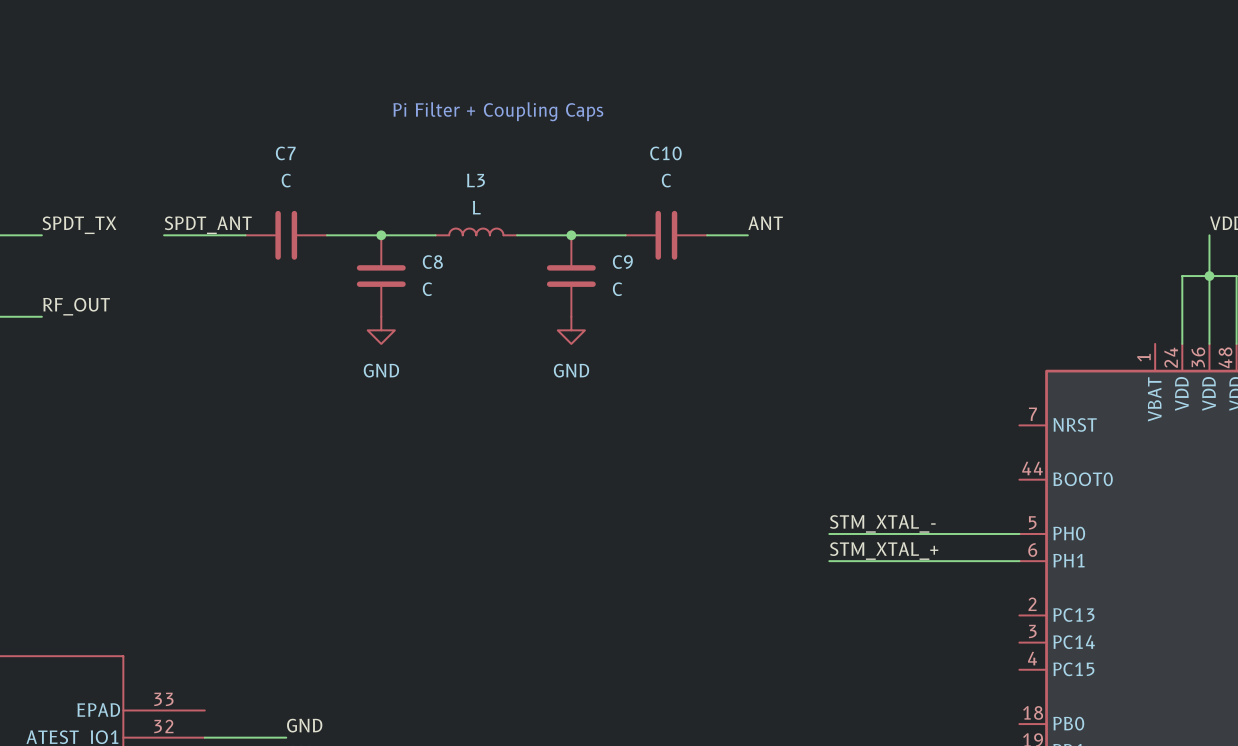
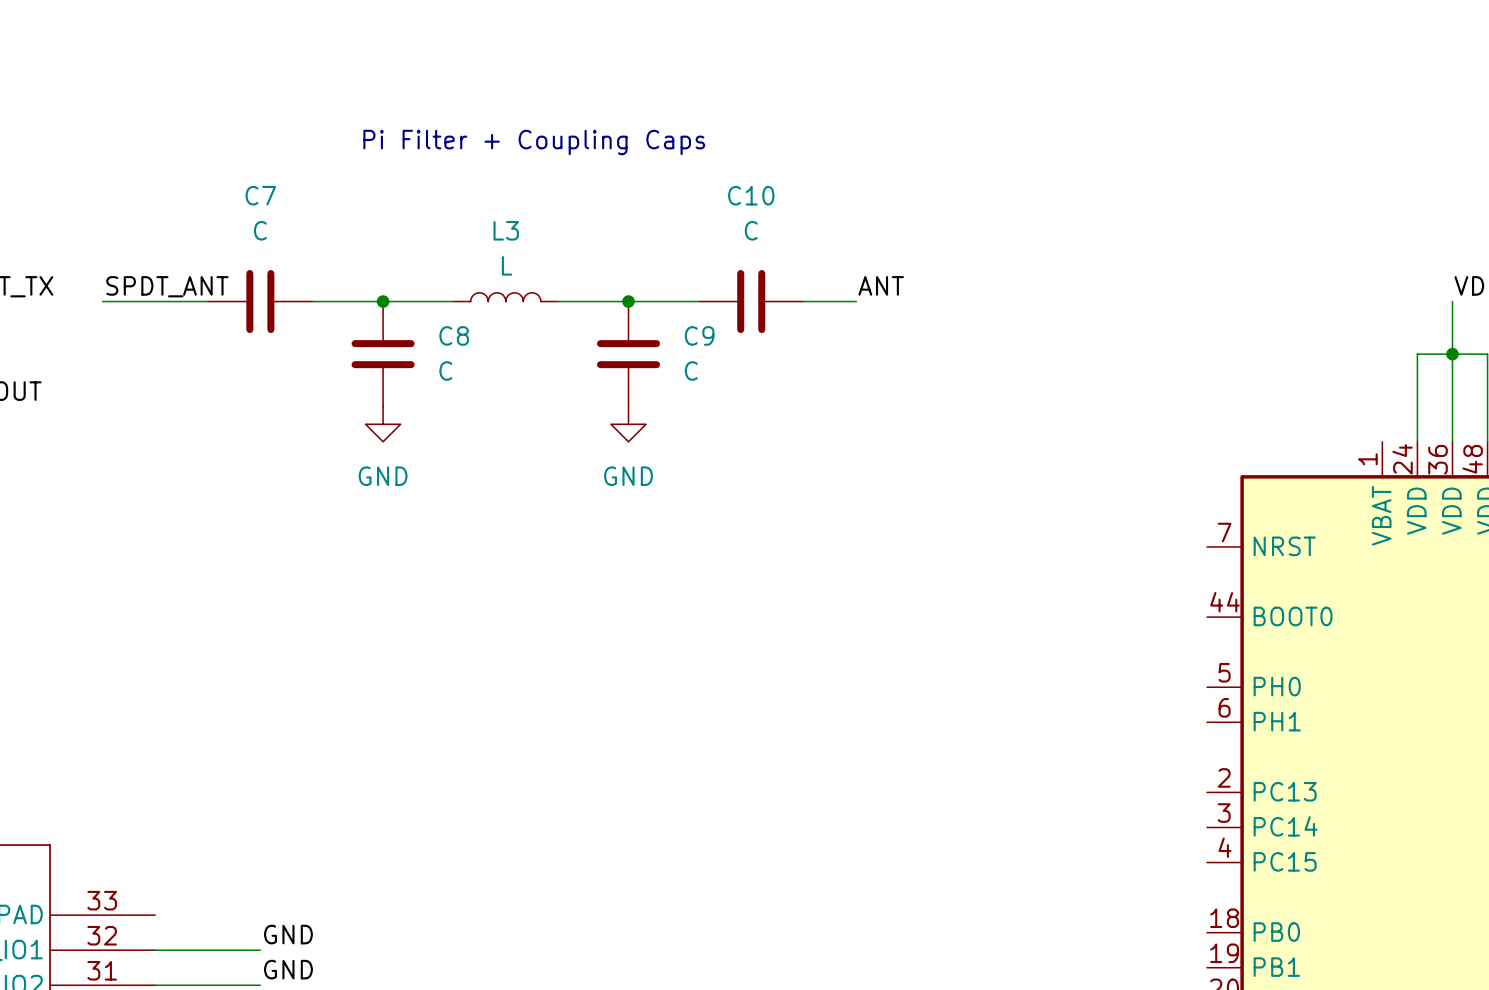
label: STM_XTAL_- (882, 523) -> none
wire: (829, 533) (1019, 533) -> none
label: STM_XTAL_+ (884, 551) -> none
wire: (829, 561) (1019, 561) -> none

